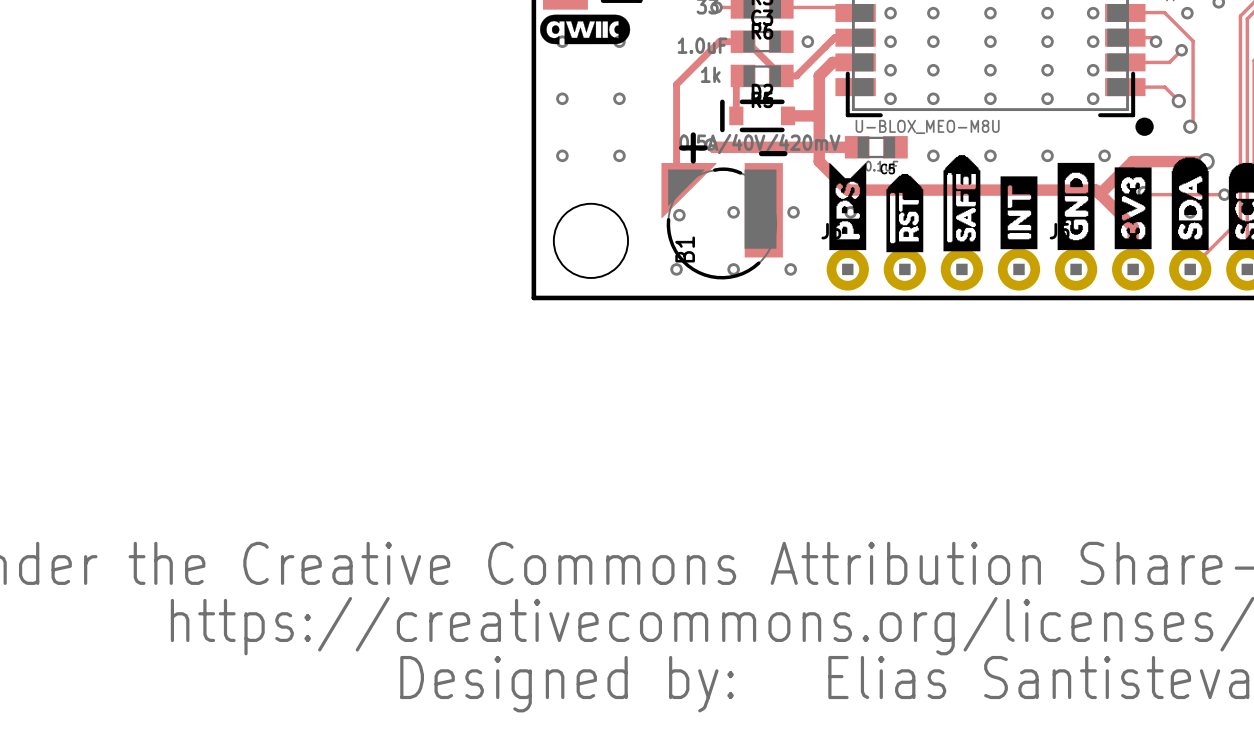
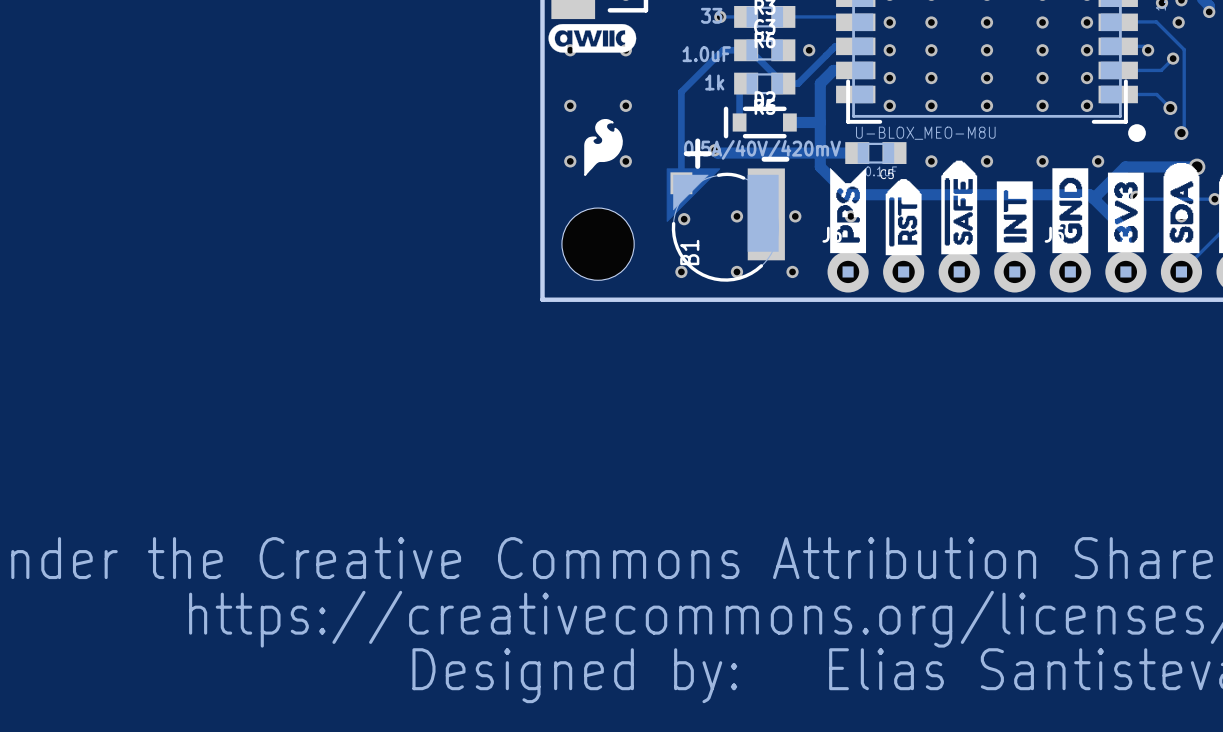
drawing: none -> [584, 119, 623, 177]

